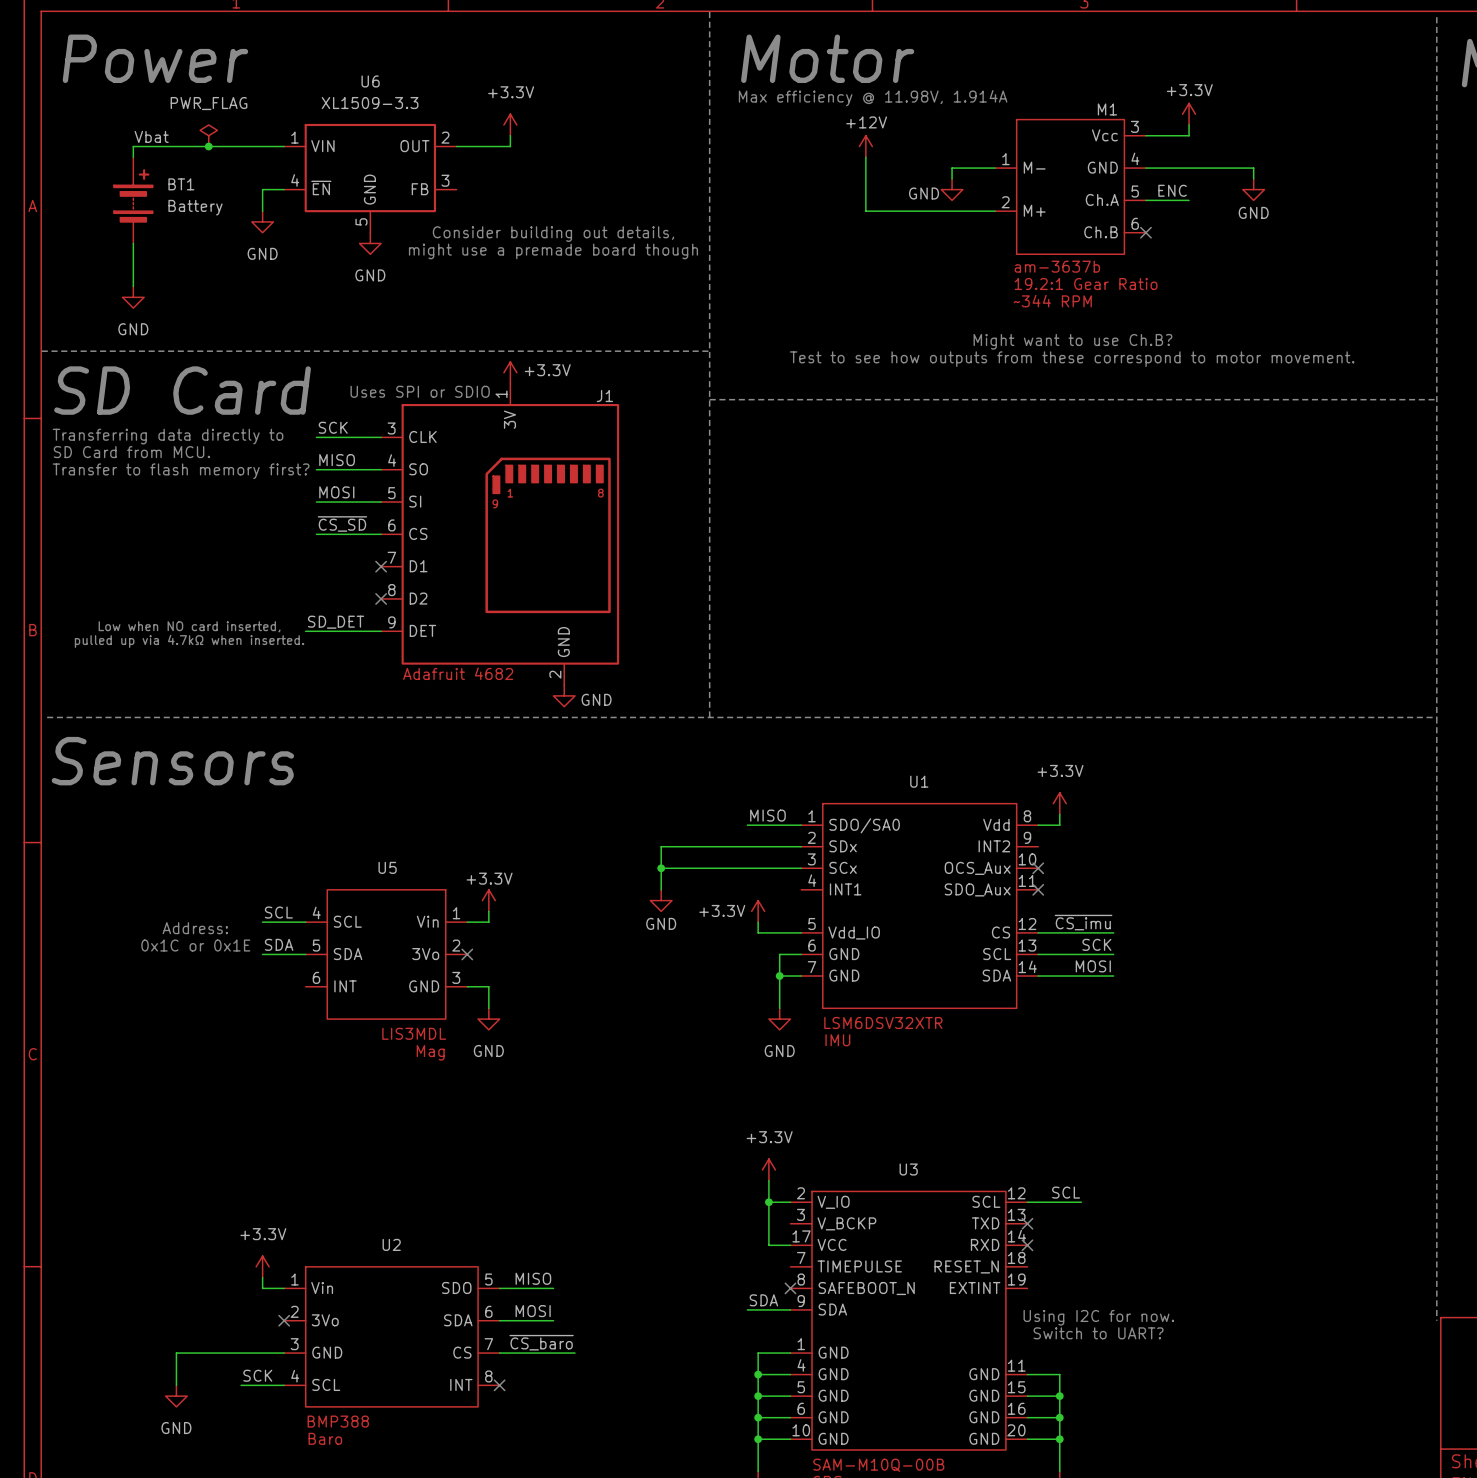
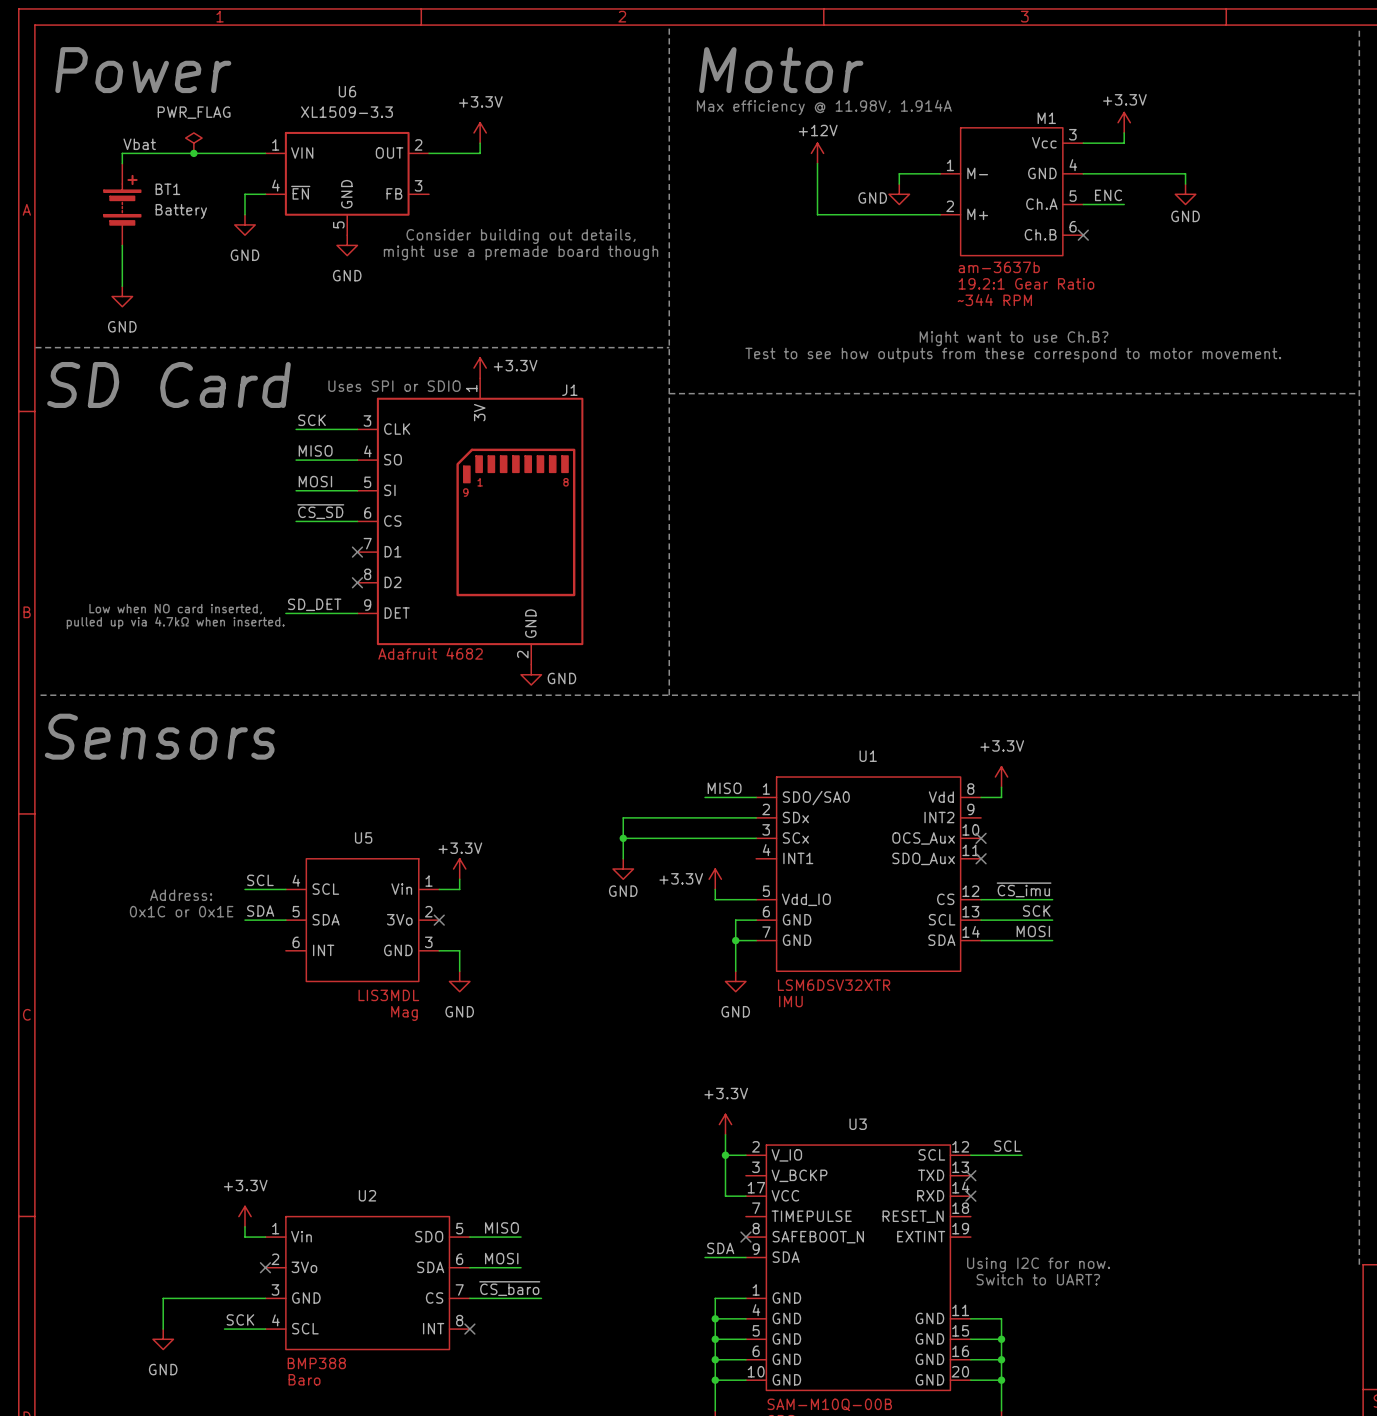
text: Transferring data directly to (168, 436) -> none
text: SD Card from MCU. (131, 452) -> none
text: Transfer to flash memory first? (181, 471) -> none

